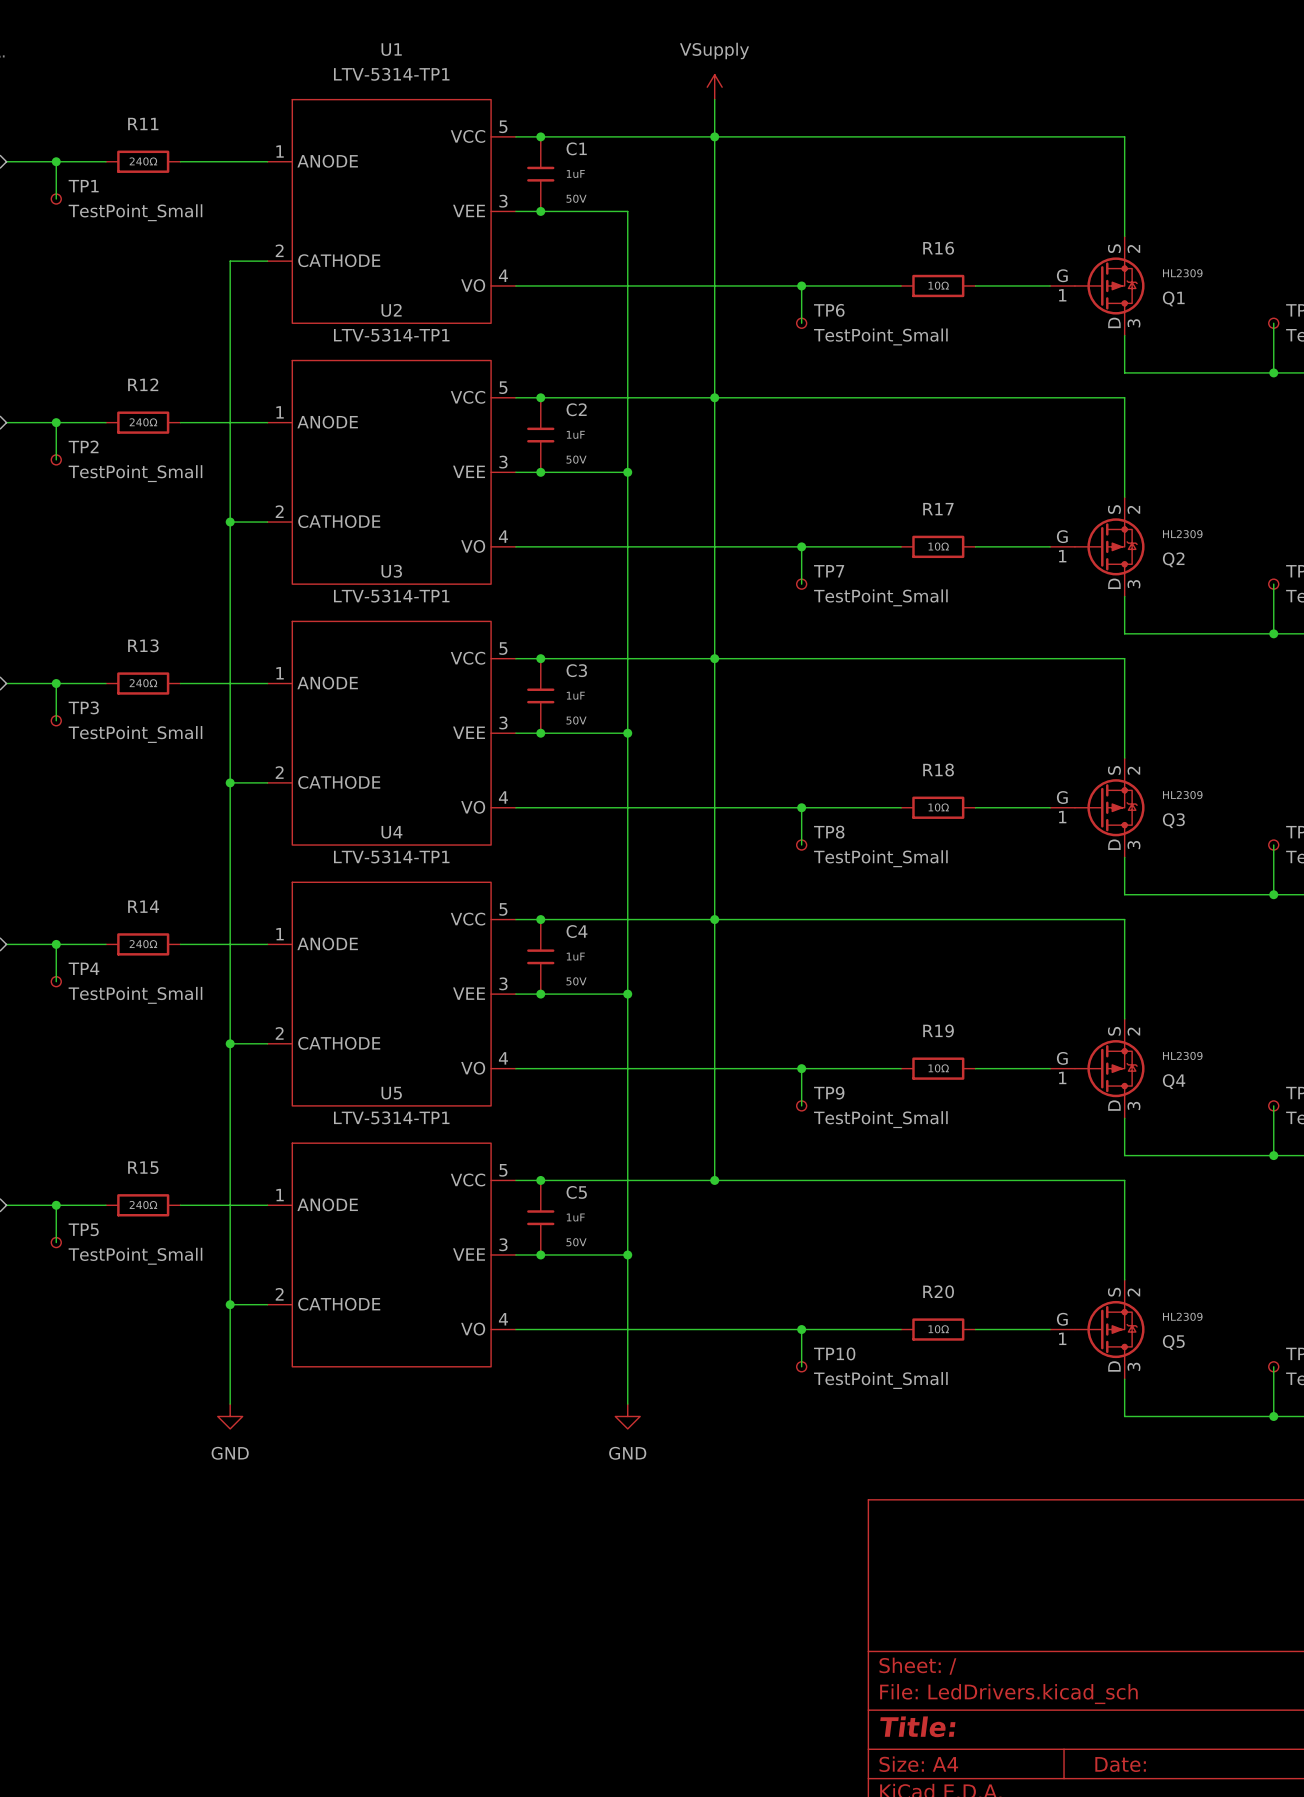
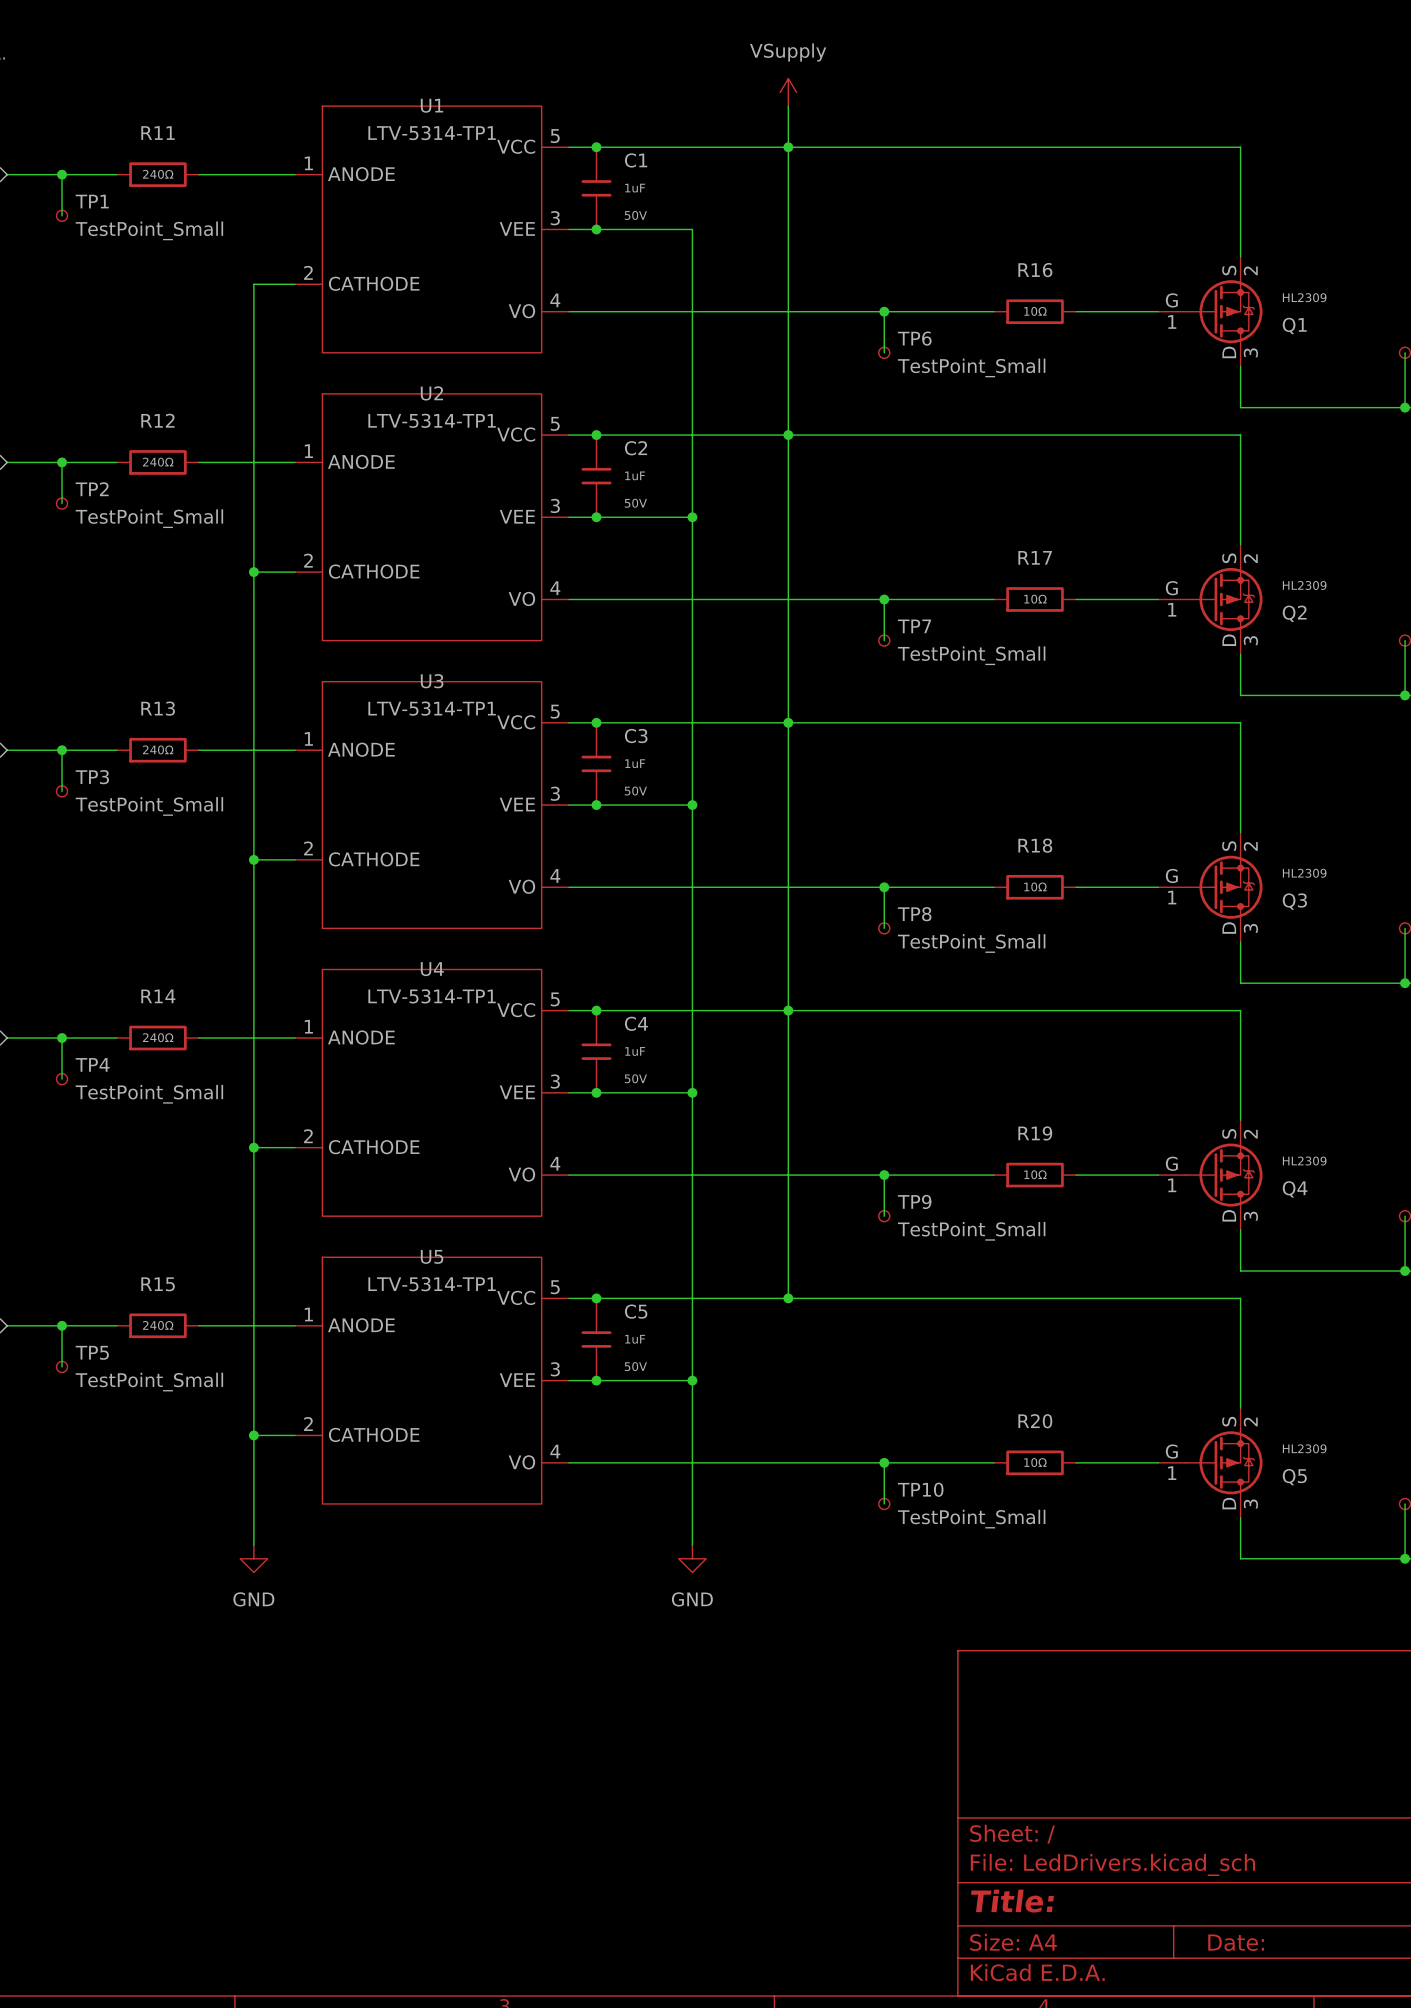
U1 name position: U1 (391, 49) -> U1 (431, 105)
U1 value position: LTV-5314-TP1 (391, 74) -> LTV-5314-TP1 (432, 133)
U2 name position: U2 (391, 310) -> U2 (431, 393)
U2 value position: LTV-5314-TP1 (391, 335) -> LTV-5314-TP1 (432, 420)
U3 name position: U3 (391, 571) -> U3 (432, 681)
U3 value position: LTV-5314-TP1 (391, 596) -> LTV-5314-TP1 (432, 708)
U4 name position: U4 (391, 832) -> U4 (432, 969)
U4 value position: LTV-5314-TP1 (391, 856) -> LTV-5314-TP1 (432, 996)
U5 name position: U5 (391, 1093) -> U5 (432, 1256)
U5 value position: LTV-5314-TP1 (391, 1117) -> LTV-5314-TP1 (432, 1284)

